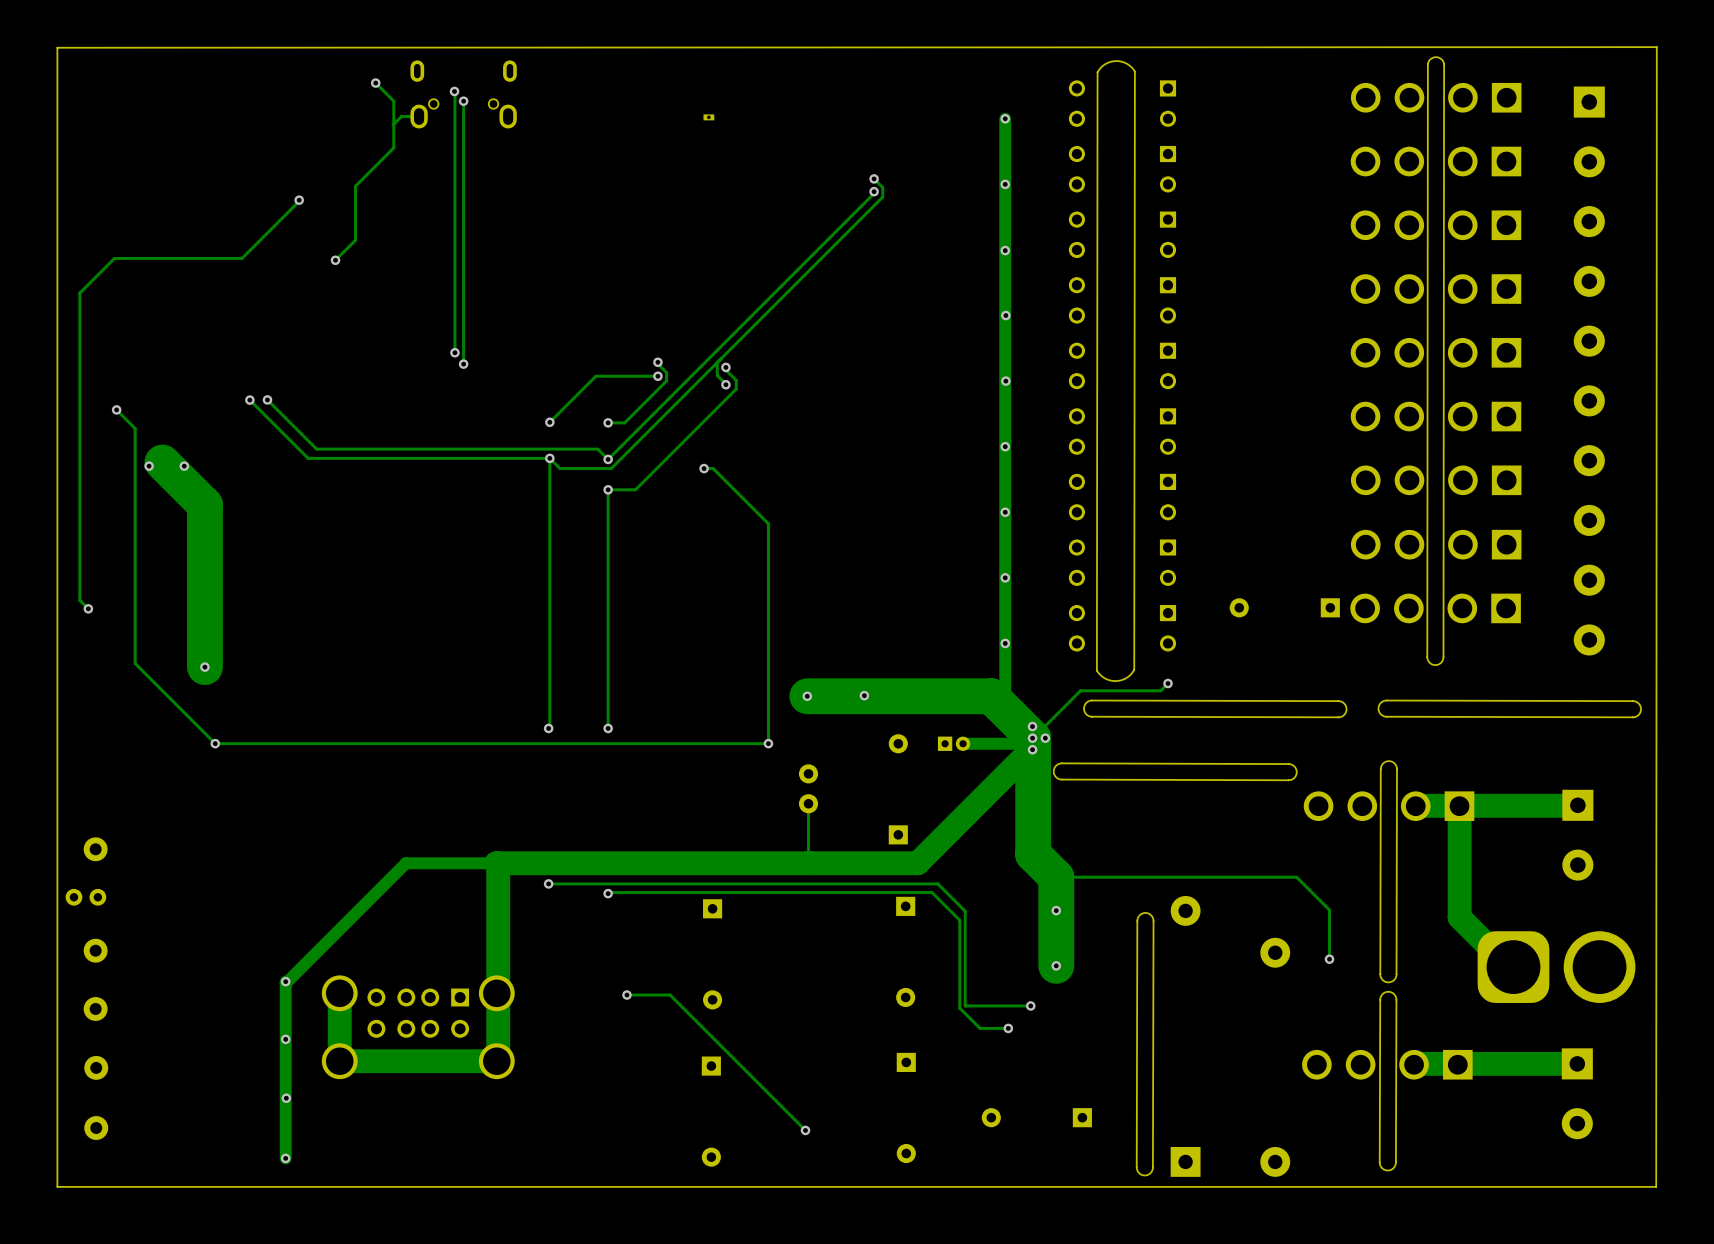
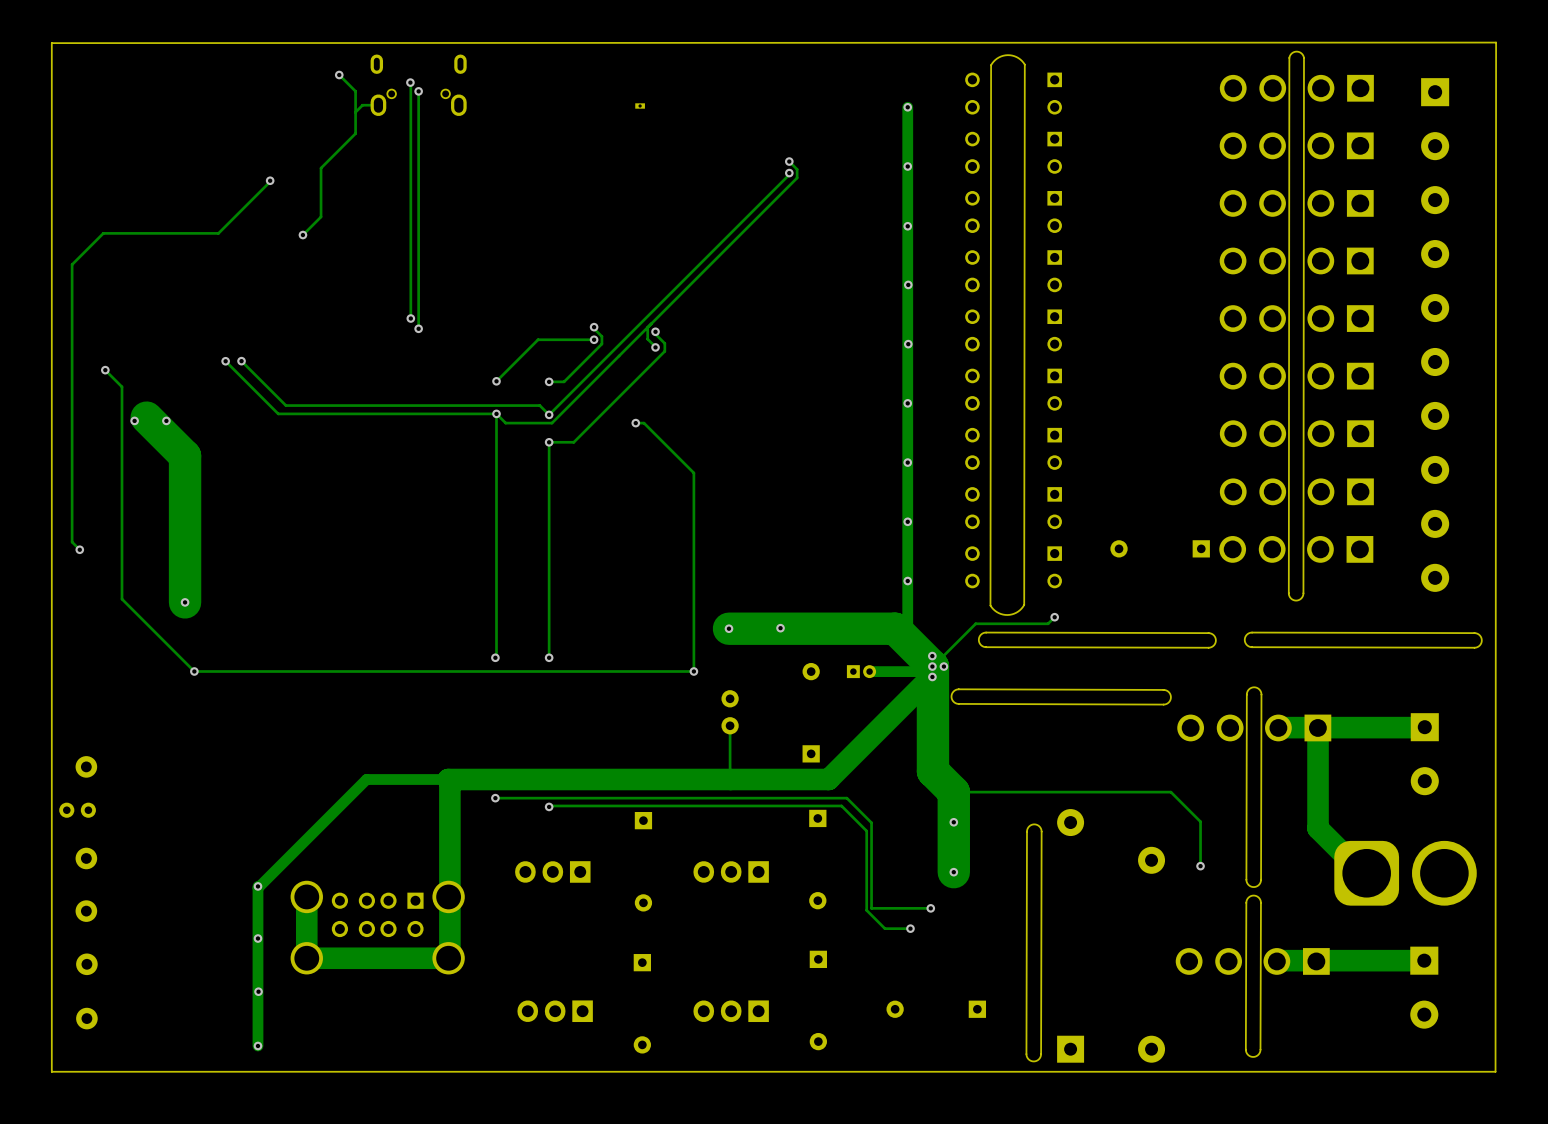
part: none -> (552, 871)
part: none -> (731, 871)
track: (626, 995) (670, 995) (805, 1130) -> none
via: (626, 995) -> none
part: none -> (555, 1011)
part: none -> (731, 1011)
via: (805, 1130) -> none

